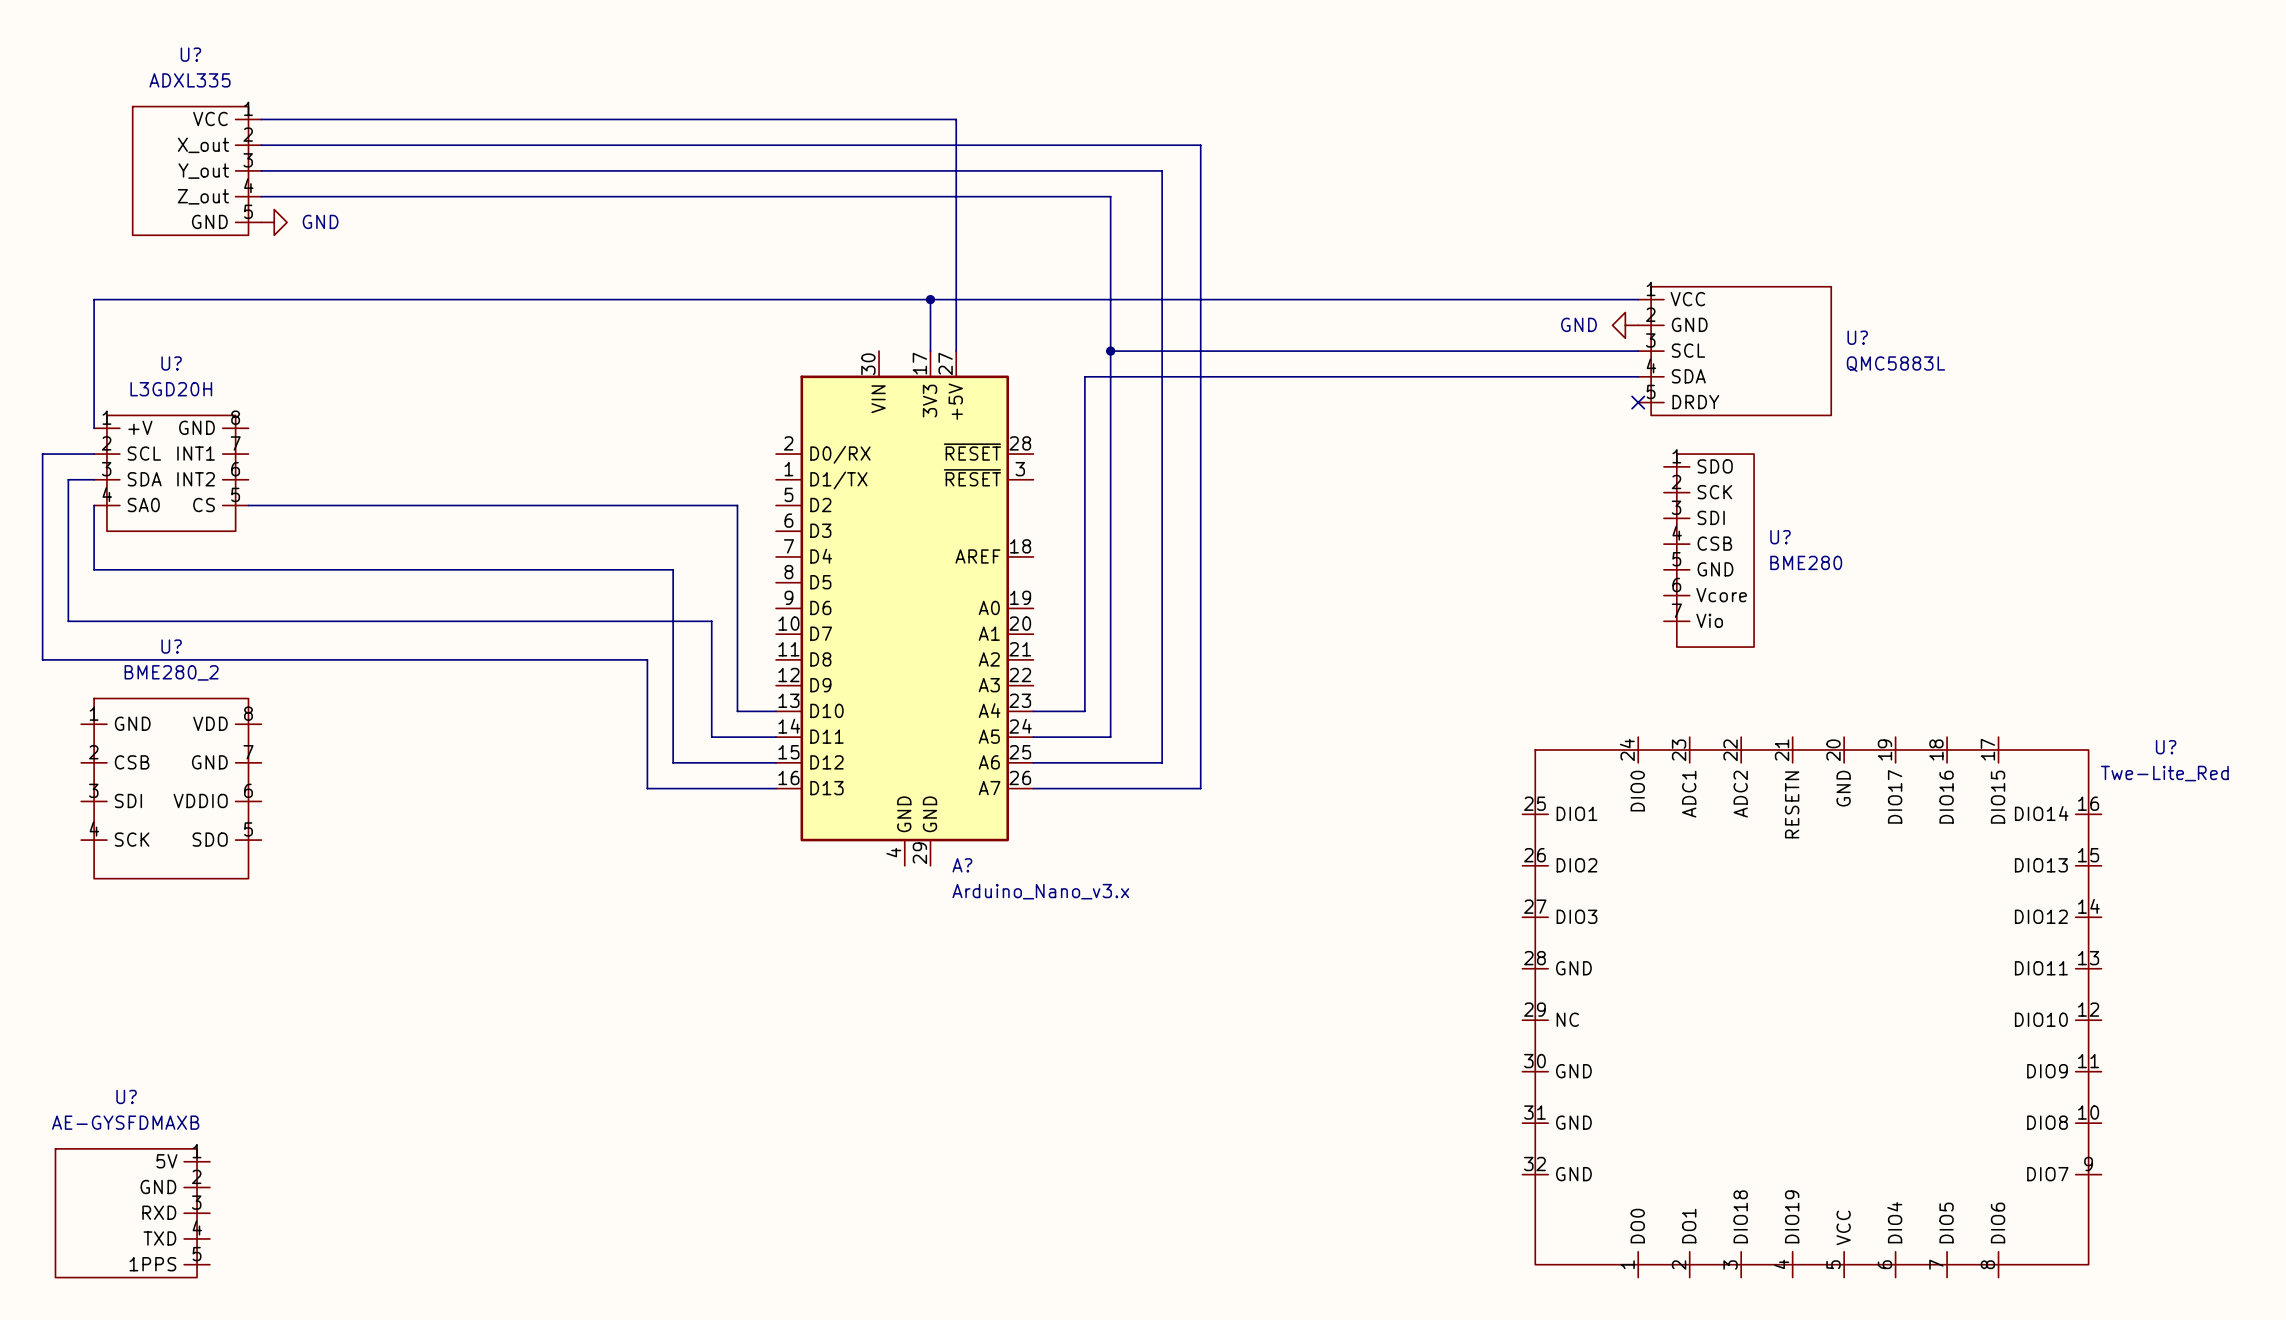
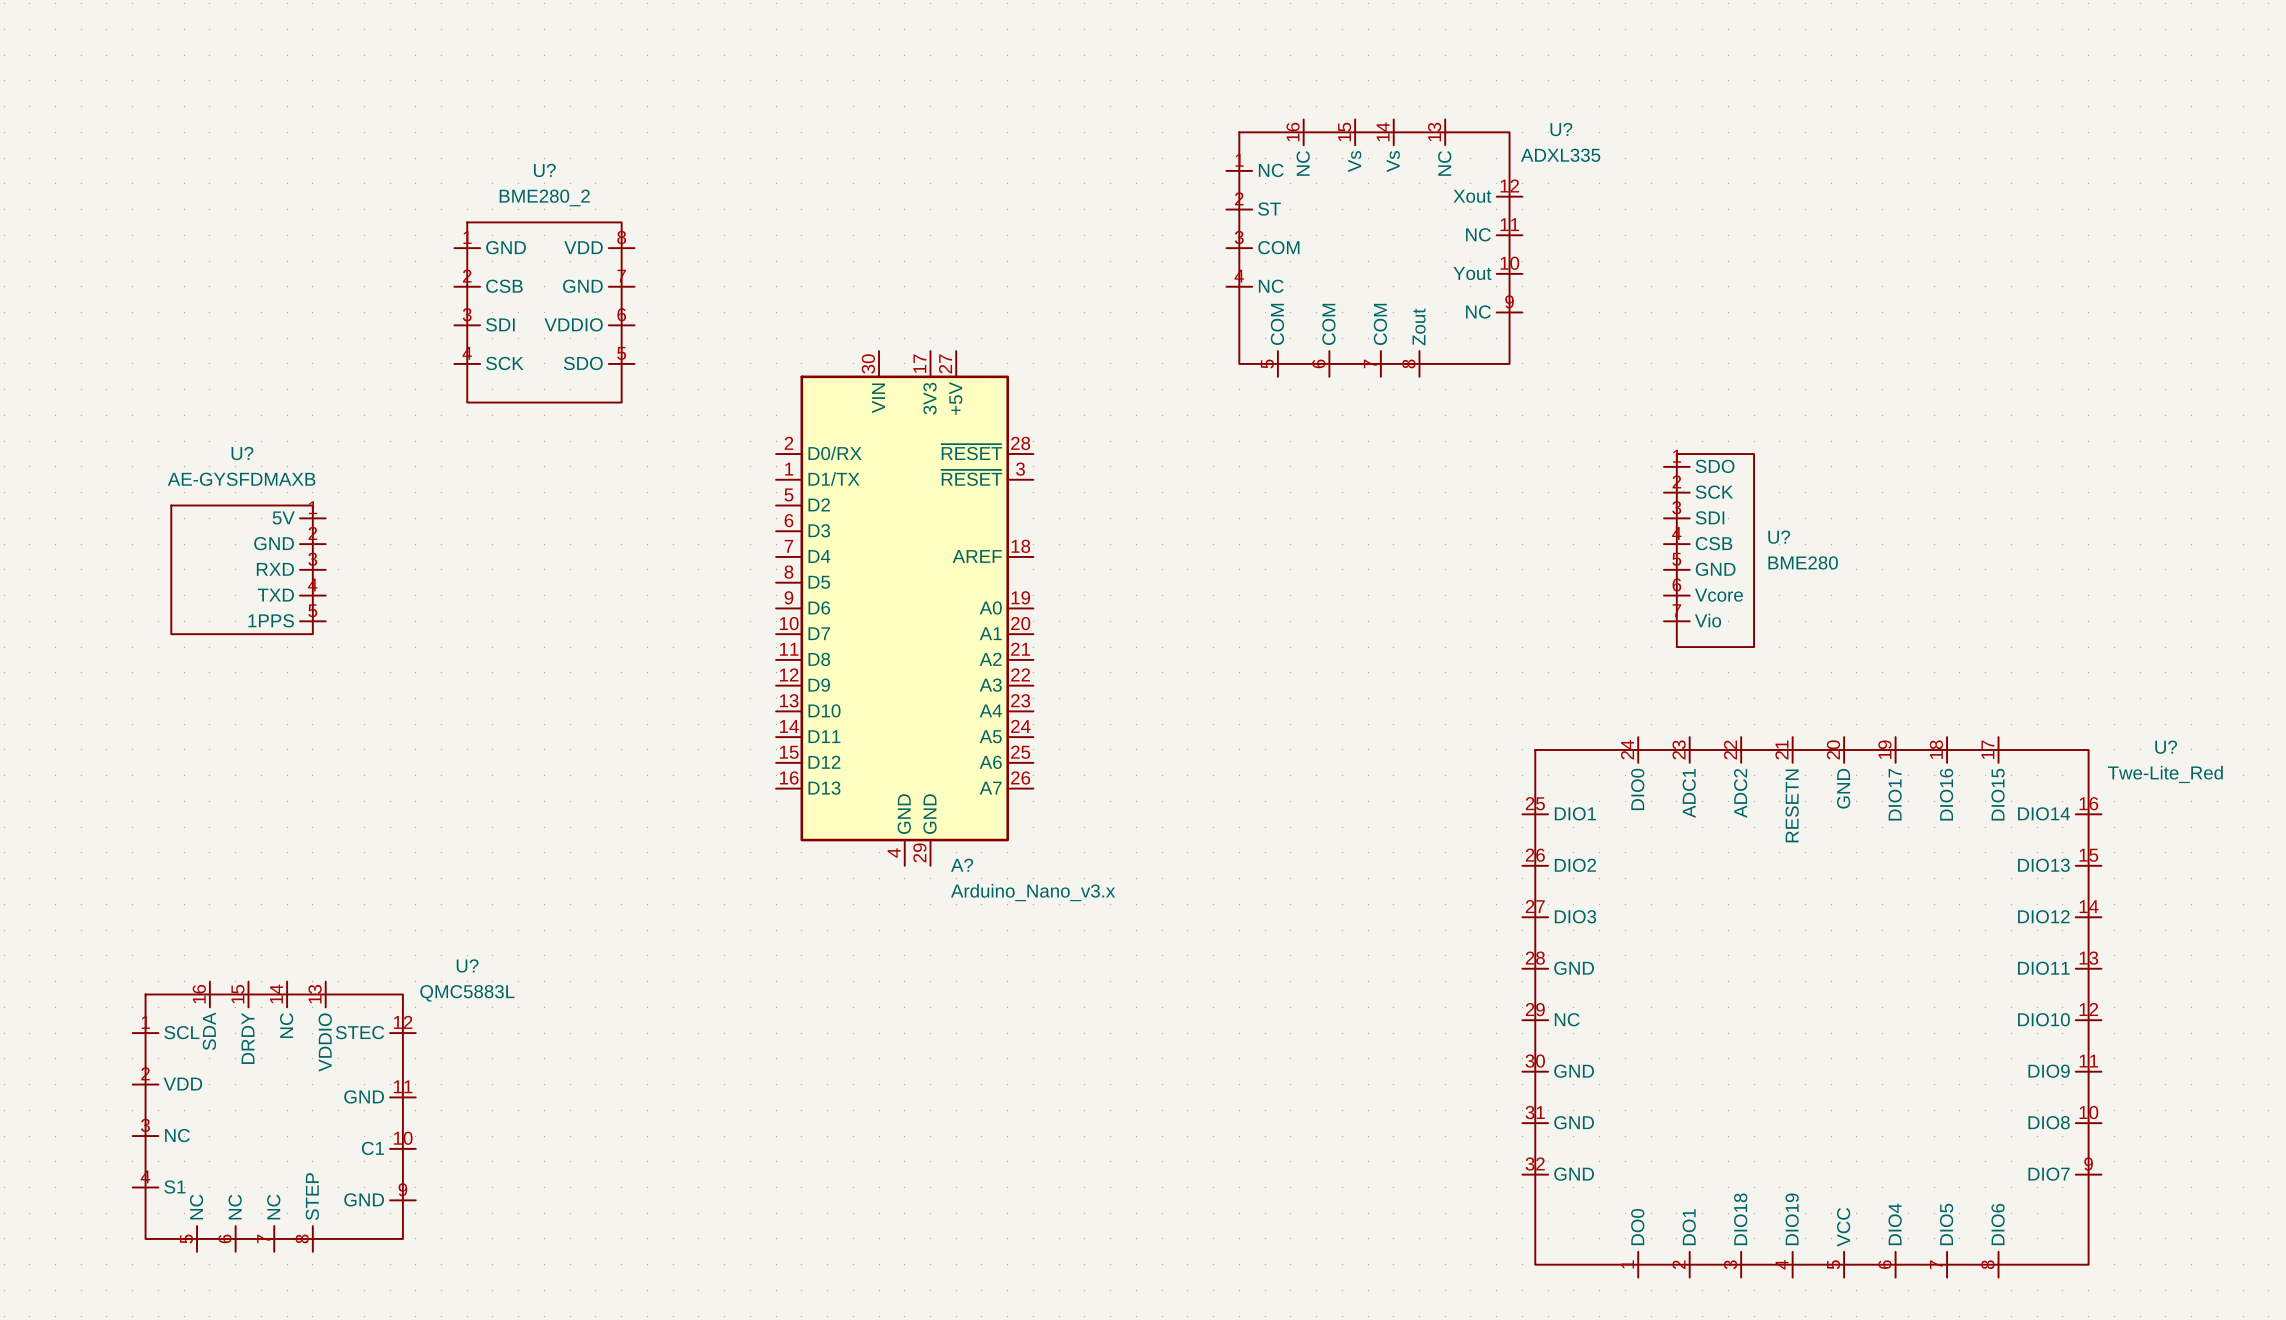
wire: (261, 119) (956, 119) (956, 351) -> none
wire: (261, 145) (1200, 145) (1200, 788) (1033, 788) -> none
U?: ADXL335 (197, 170) -> none
wire: (261, 170) (1162, 170) (1162, 762) (1033, 762) -> none
wire: (261, 196) (1110, 196) (1110, 737) (1033, 737) -> none
power symbol: GND (274, 222) -> none
U?: none -> ADXL335 (1374, 248)
wire: (930, 299) (930, 351) -> none
junction: (930, 299) -> none
wire: (1638, 299) (94, 299) (94, 428) -> none
U?: none -> BME280_2 (544, 312)
power symbol: GND (1625, 325) -> none
wire: (1110, 351) (1638, 351) -> none
junction: (1110, 351) -> none
U?: QMC5883L (1734, 351) -> none
wire: (1638, 376) (1084, 376) (1084, 711) (1033, 711) -> none
no-connect mark: (1638, 402) -> none
wire: (94, 454) (42, 454) (42, 659) (647, 659) (647, 788) (776, 788) -> none
U?: L3GD20H (171, 473) -> none
wire: (94, 479) (68, 479) (68, 621) (711, 621) (711, 737) (776, 737) -> none
wire: (94, 505) (94, 569) (673, 569) (673, 762) (776, 762) -> none
wire: (248, 505) (737, 505) (737, 711) (776, 711) -> none
U?: none -> AE-GYSFDMAXB (248, 569)
U?: BME280_2 (171, 788) -> none
U?: none -> QMC5883L (274, 1116)
U?: AE-GYSFDMAXB (132, 1213) -> none

